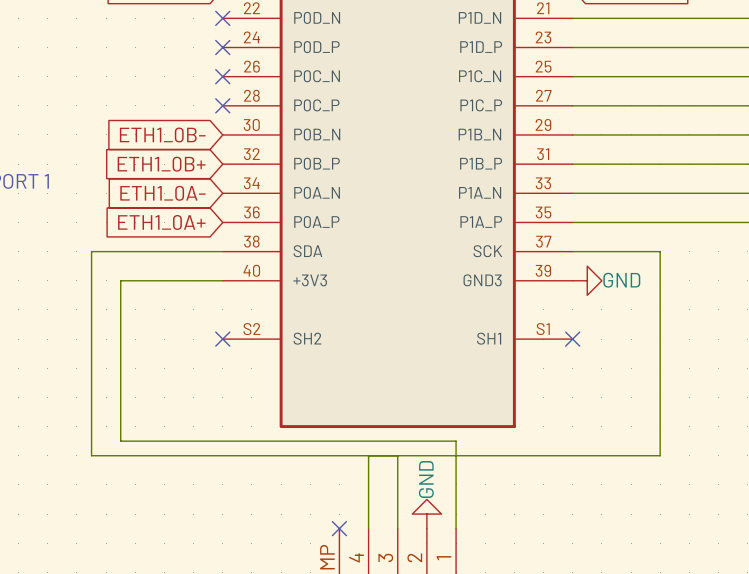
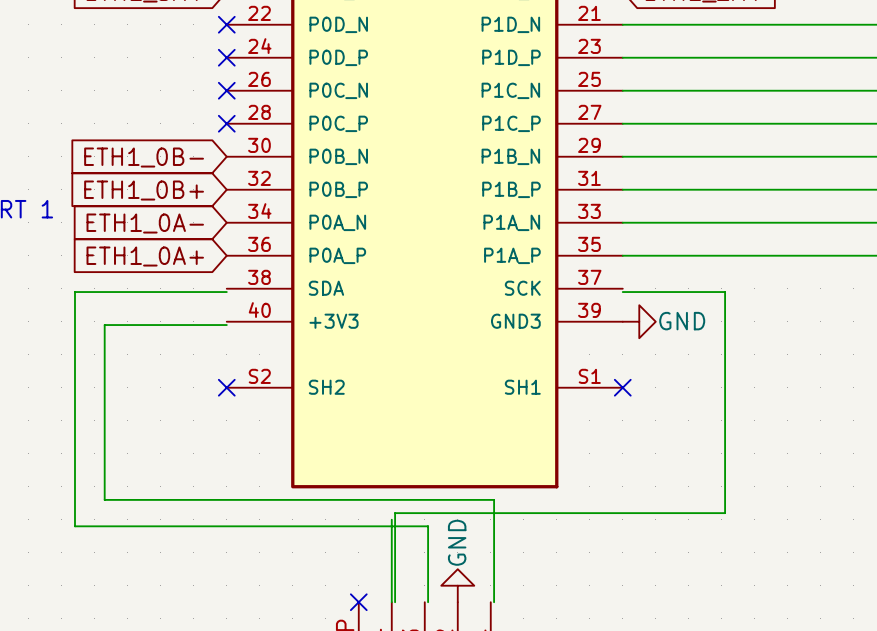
wire: (222, 251) (91, 251) (91, 455) (660, 455) (660, 251) (572, 251) -> none
wire: none -> (226, 292) (74, 292) (74, 526) (428, 526) (428, 602)
wire: none -> (622, 292) (725, 292) (725, 513) (395, 513) (395, 602)
wire: (222, 280) (120, 280) (120, 441) (456, 441) (456, 528) -> none
wire: none -> (226, 325) (104, 325) (104, 499) (494, 499) (494, 602)
wire: (397, 455) (397, 528) -> none

